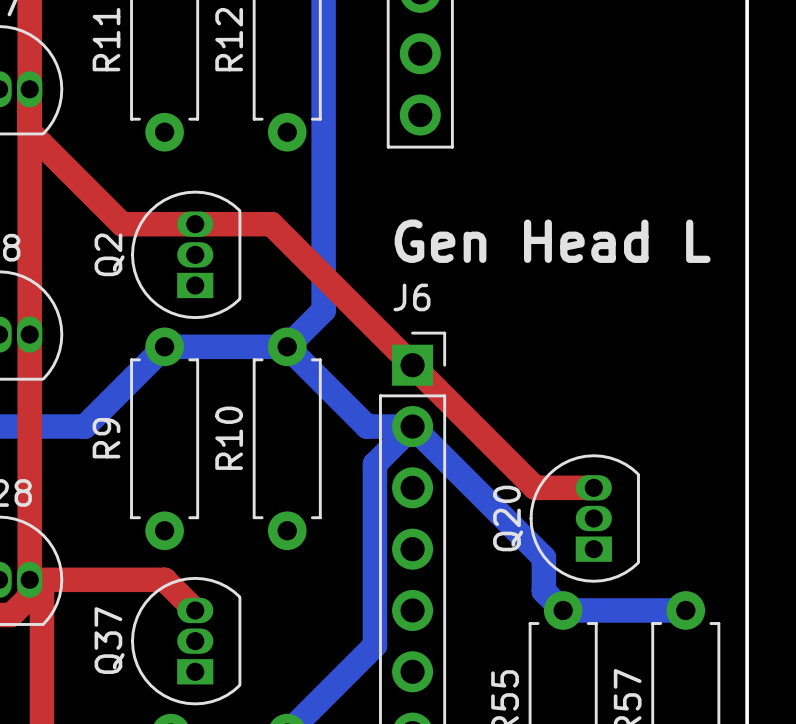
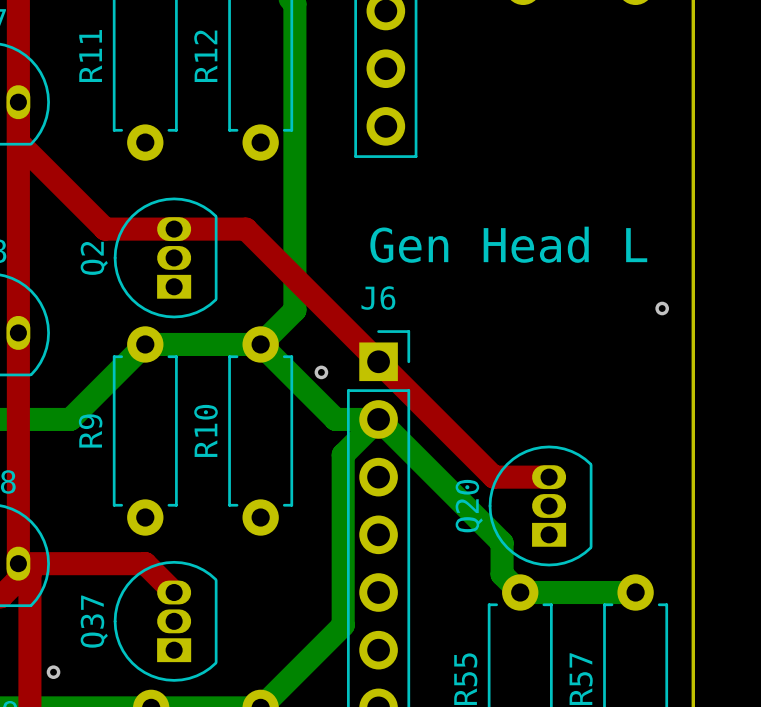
via: none -> (662, 308)
via: none -> (321, 372)
via: none -> (53, 672)

